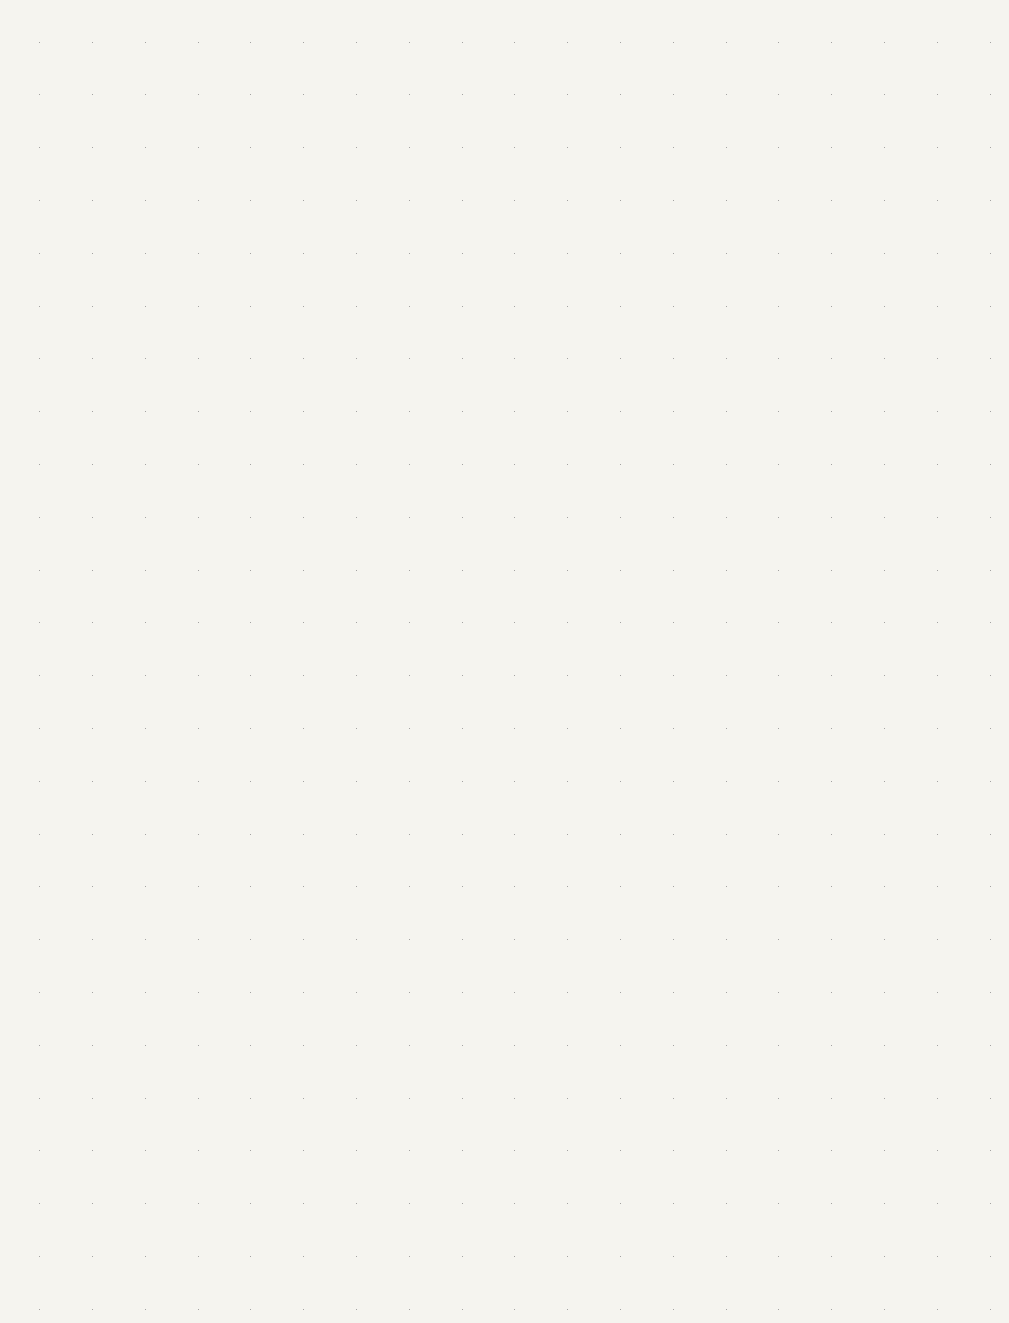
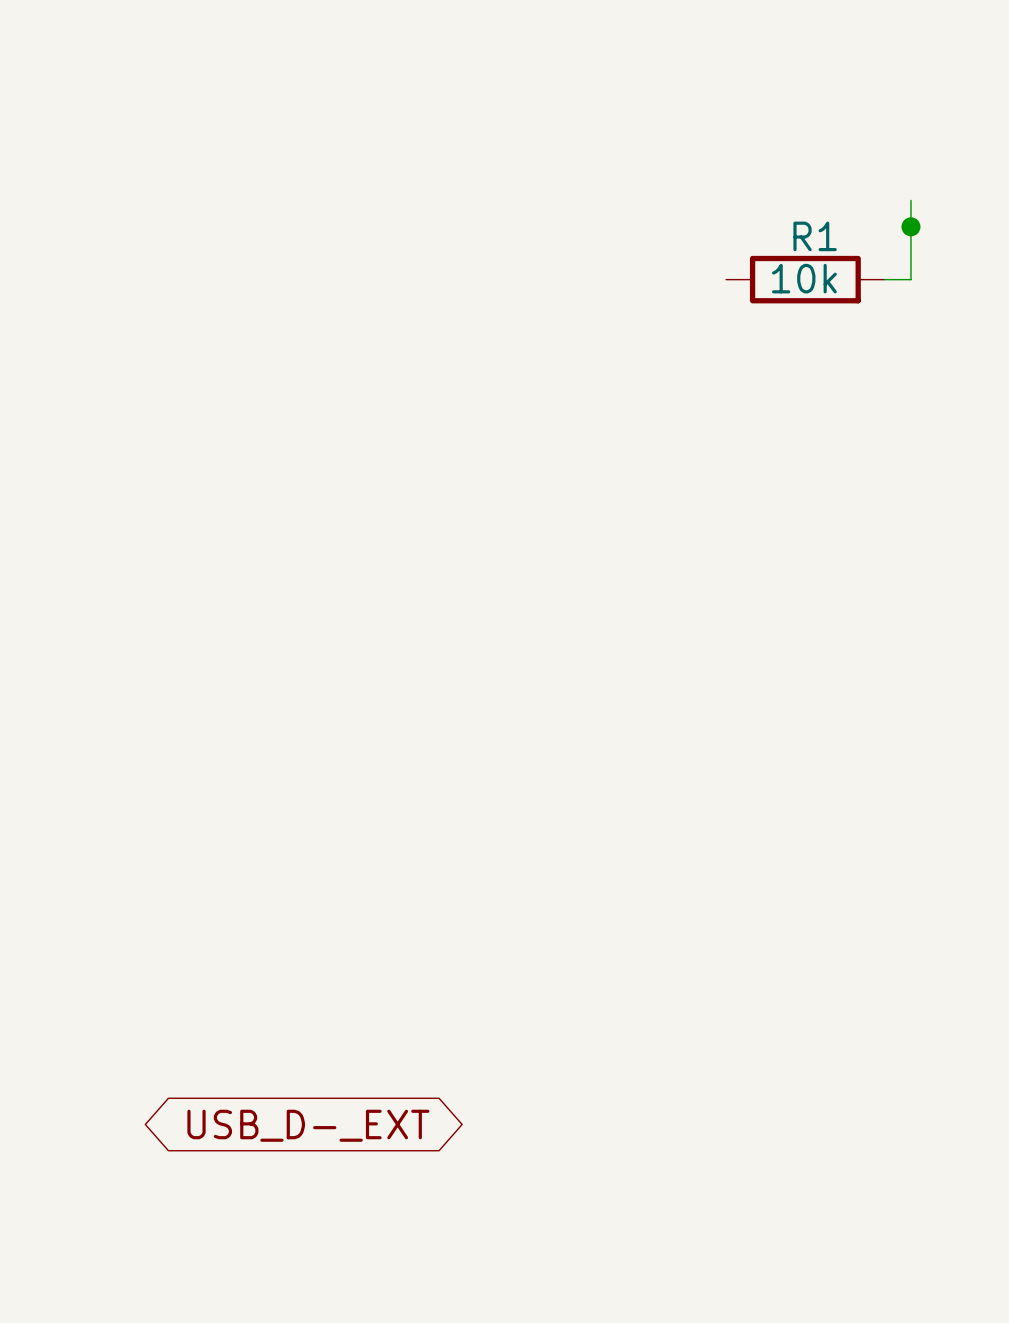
wire: none -> (910, 200) (910, 279) (884, 279)
junction: none -> (910, 226)
R1: none -> 10k (805, 279)
global label: none -> USB_D-_EXT (308, 1125)

